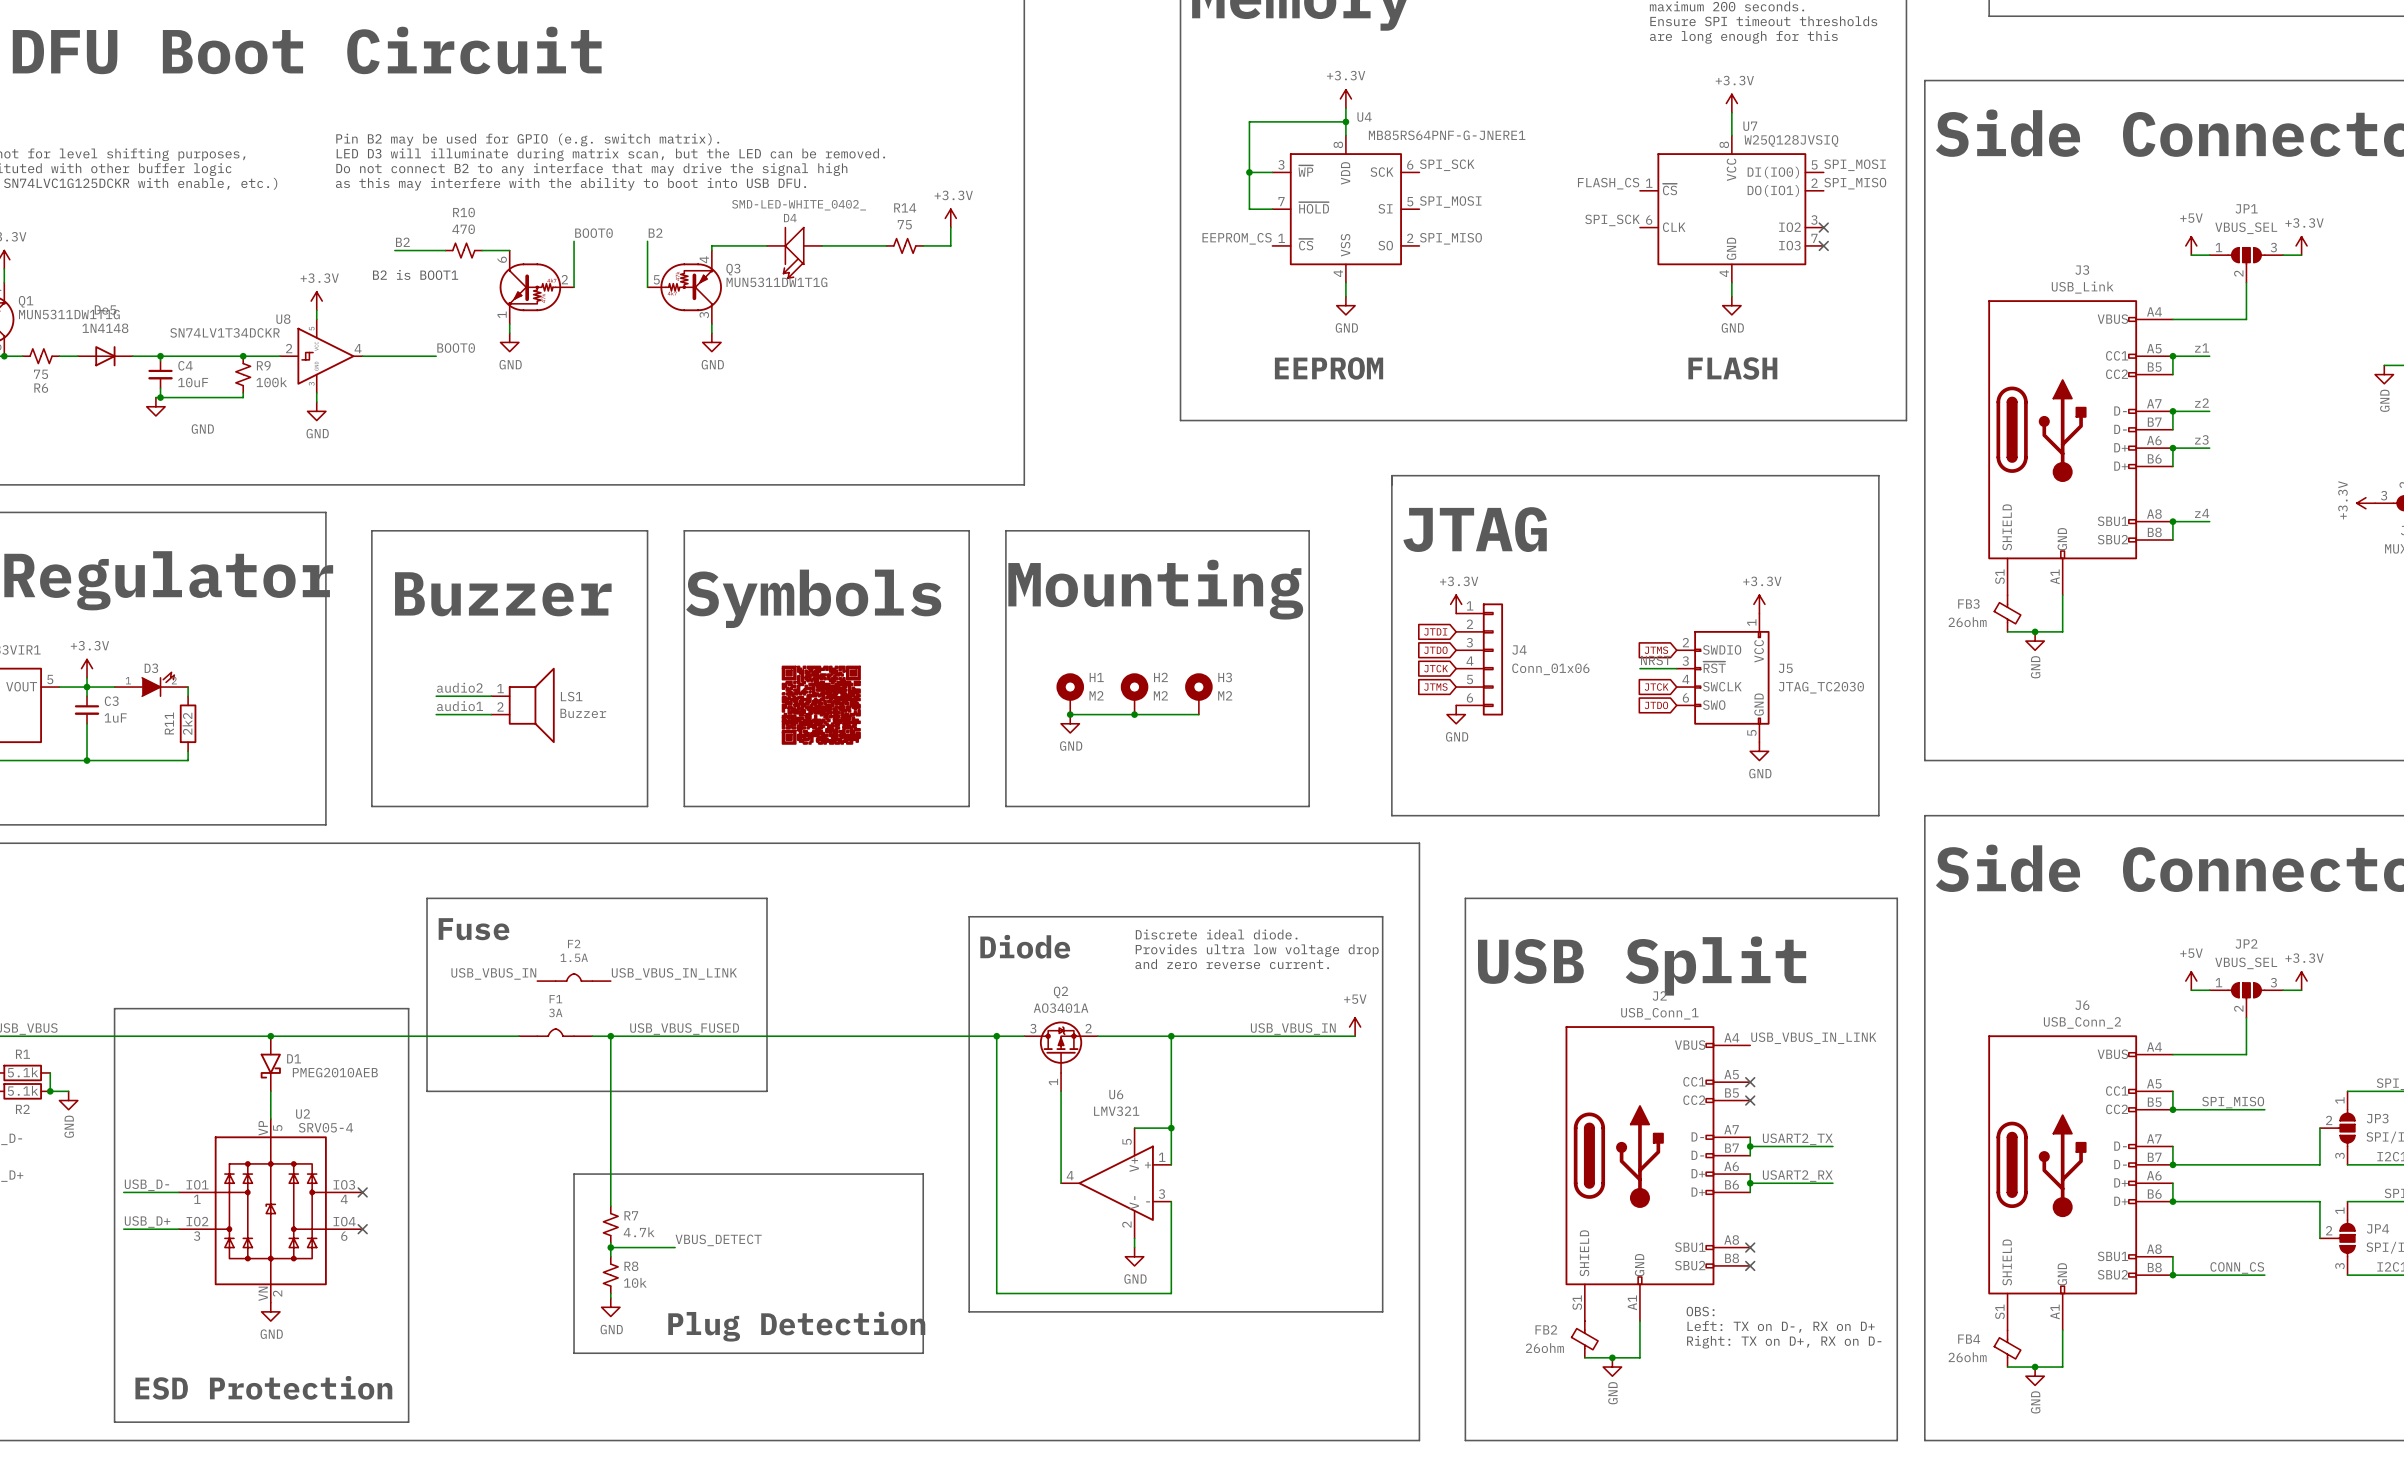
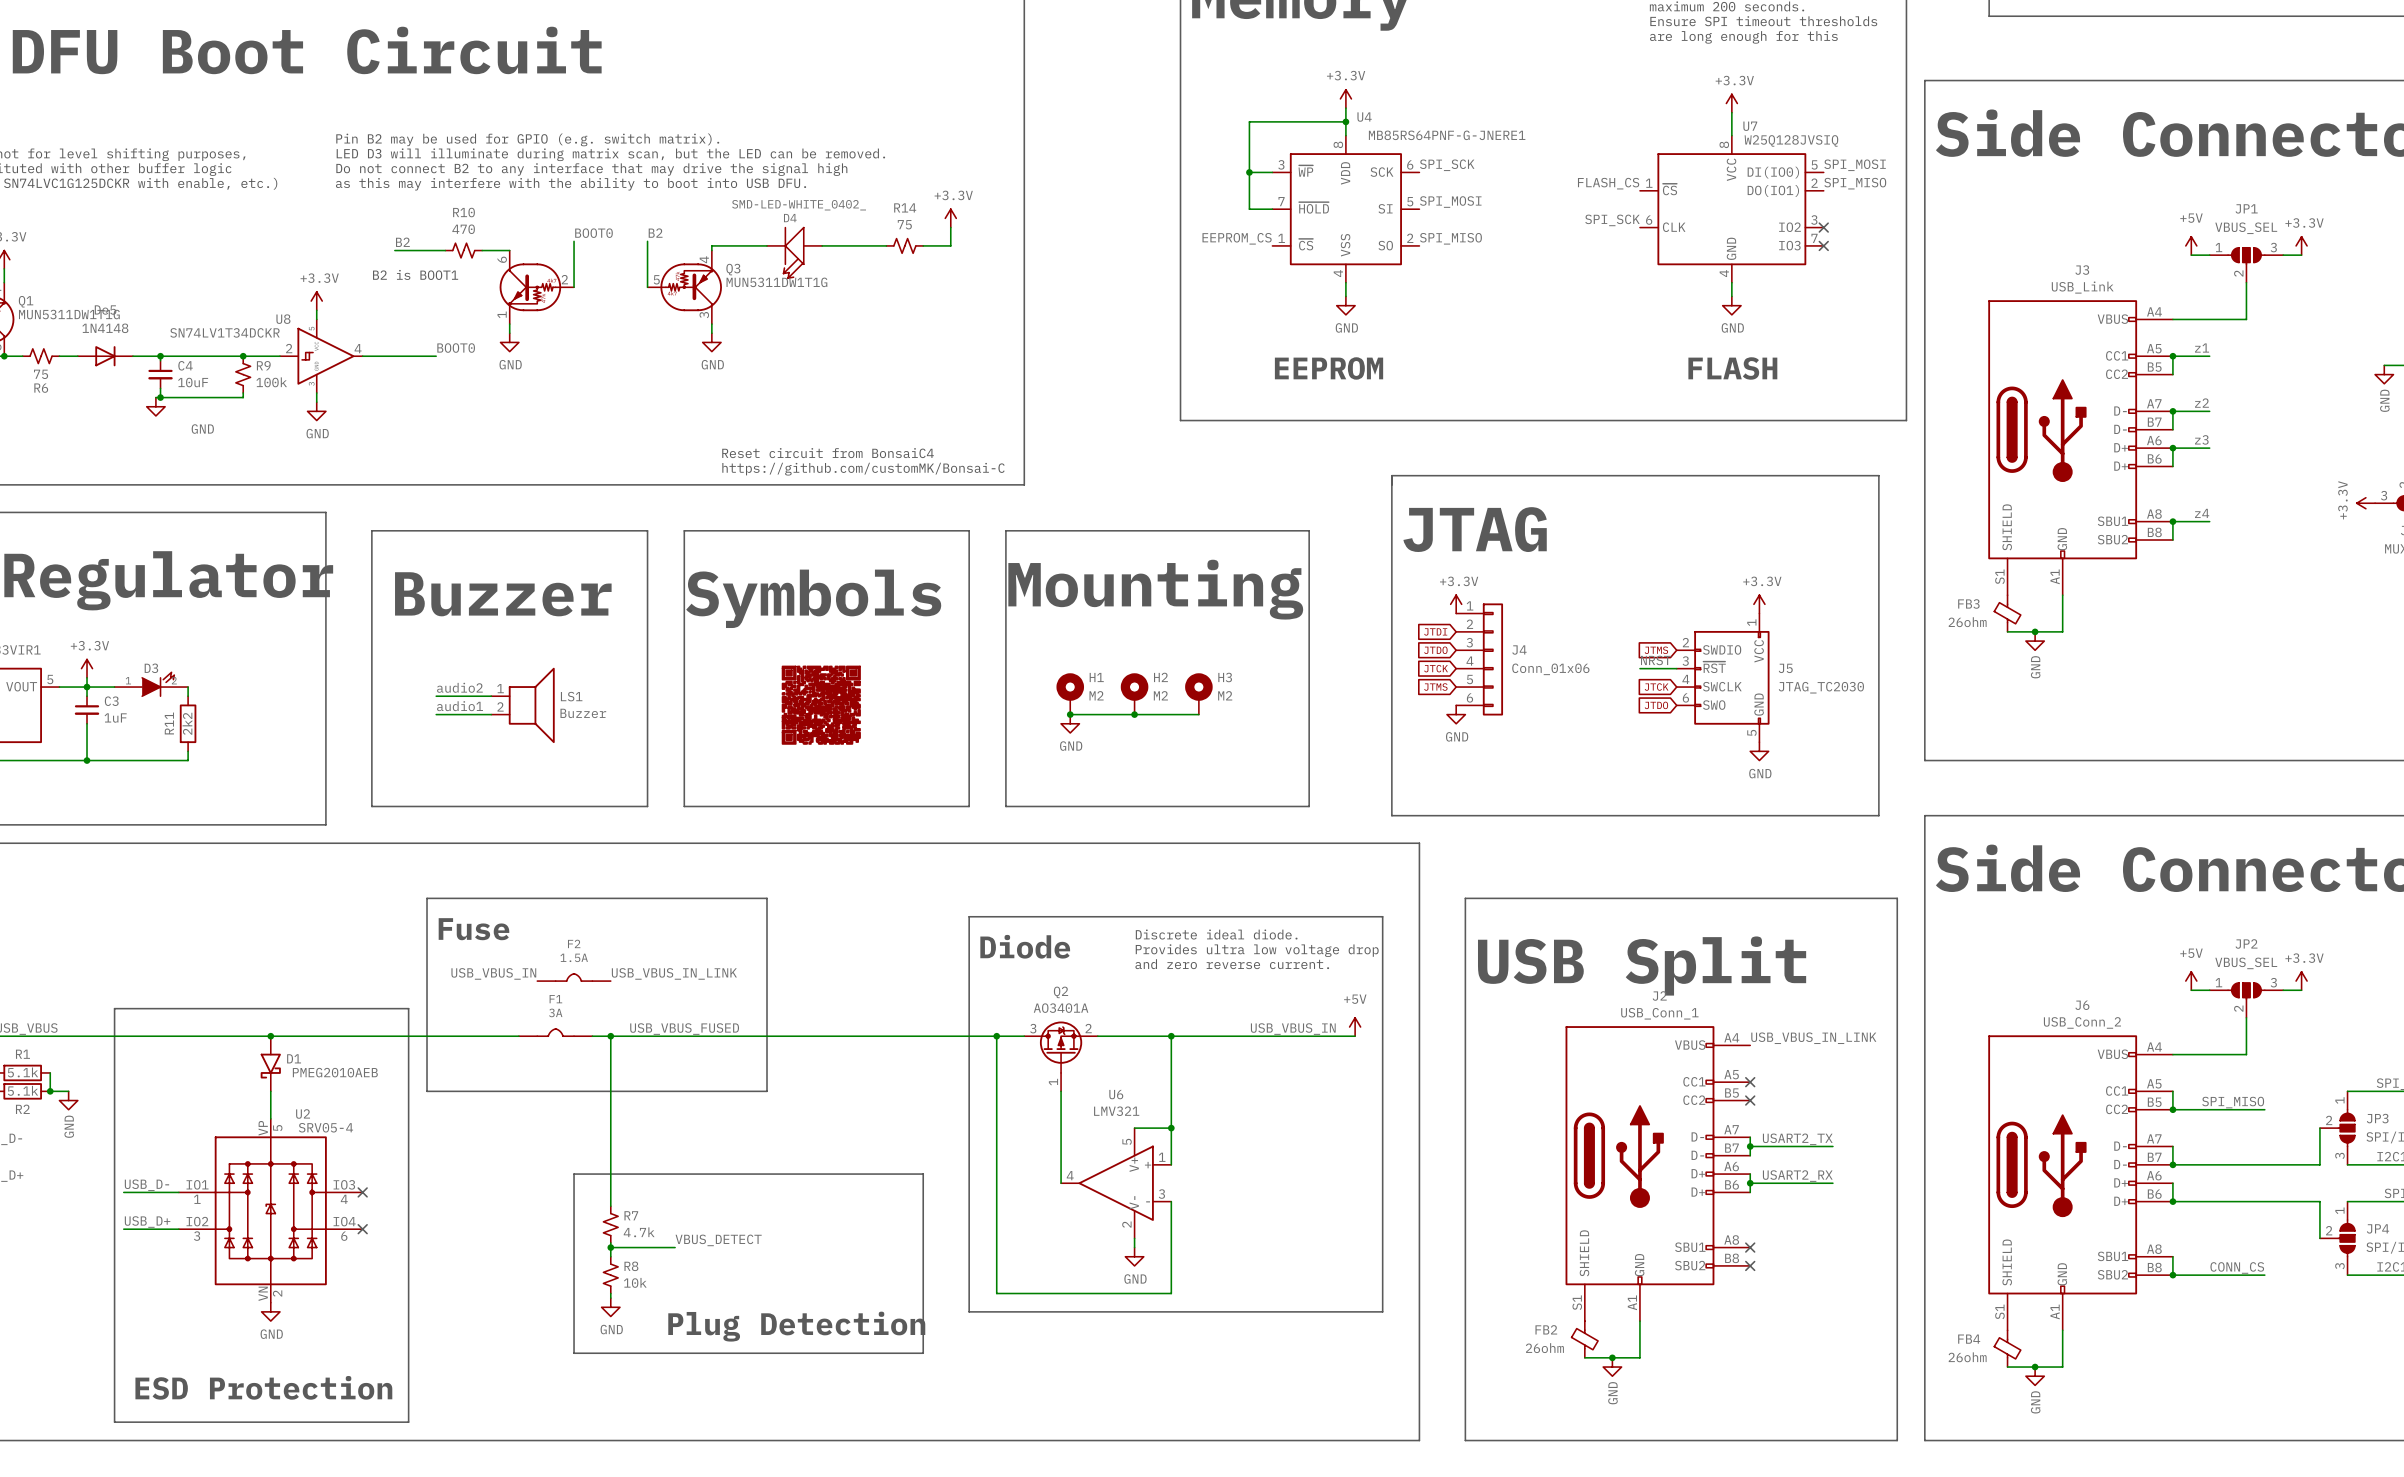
text: none -> Reset circuit from BonsaiC4 (828, 453)
text: none -> https://github.com/customMK/Bonsai-C (863, 469)
text: OBS: (1700, 1311) -> none
text: Left: TX on D-, RX on D+ (1781, 1326) -> none
text: Right: TX on D+, RX on D- (1784, 1342) -> none

